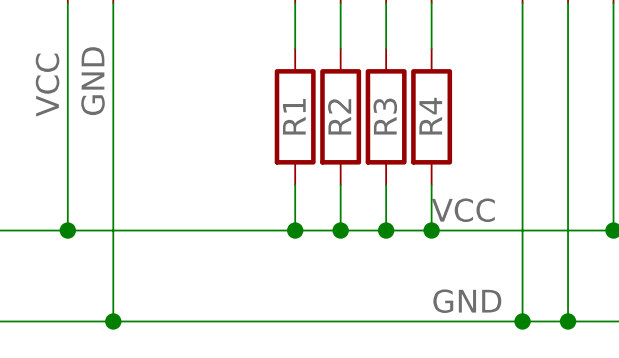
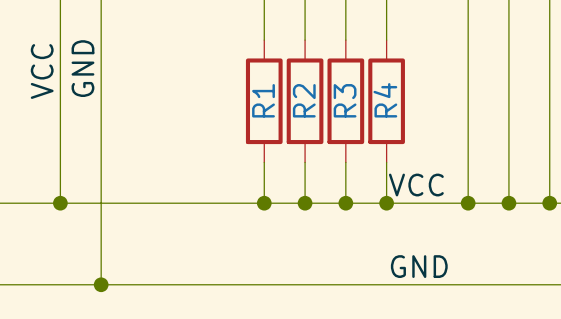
wire: (522, 230) (522, 321) -> none
junction: none -> (468, 203)
wire: (568, 230) (568, 321) -> none
junction: none -> (508, 203)
junction: (522, 321) -> none
junction: (568, 321) -> none

